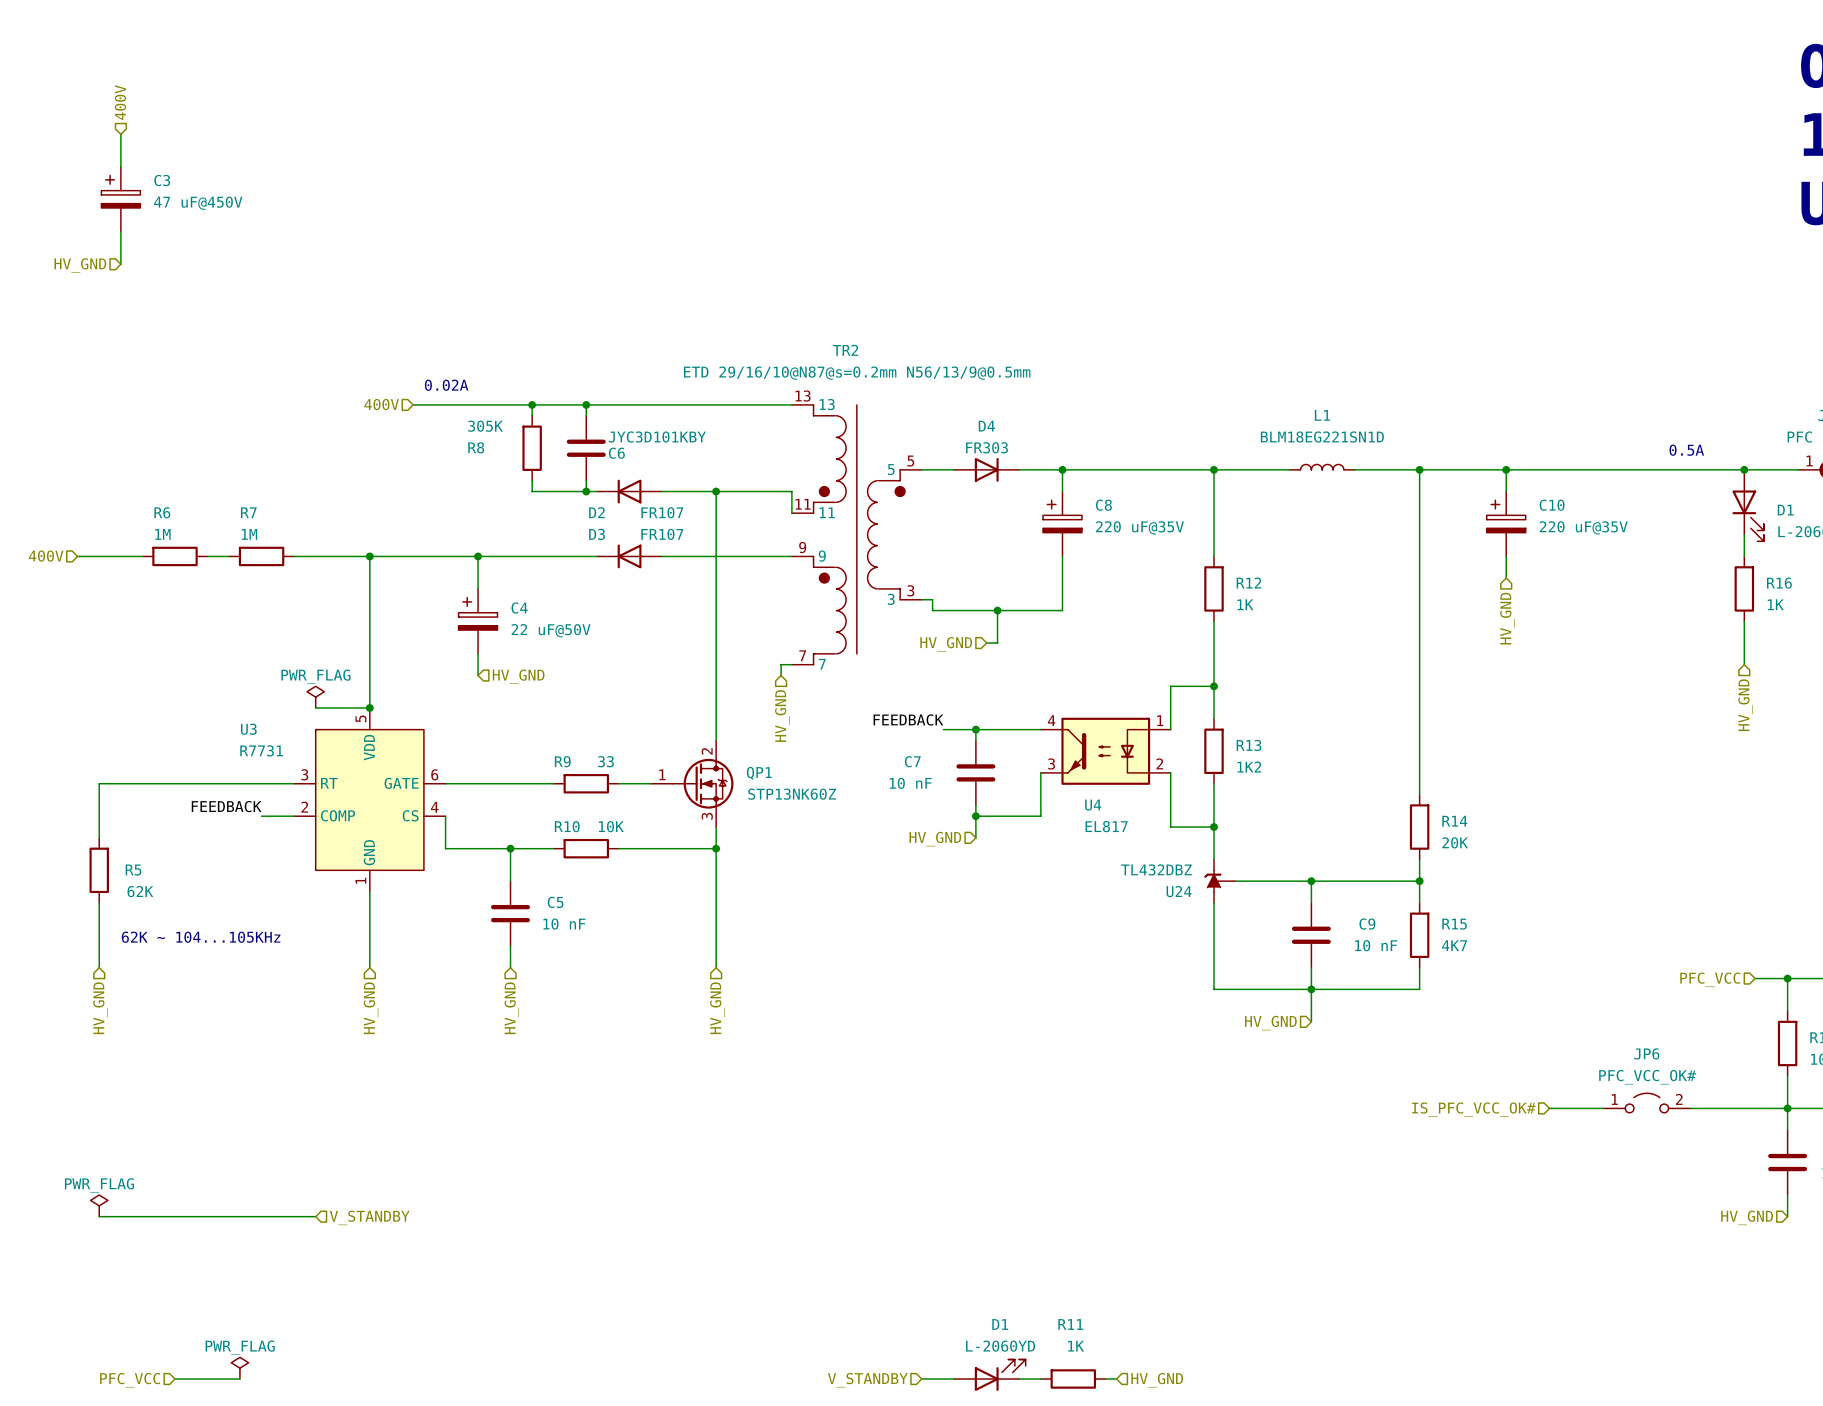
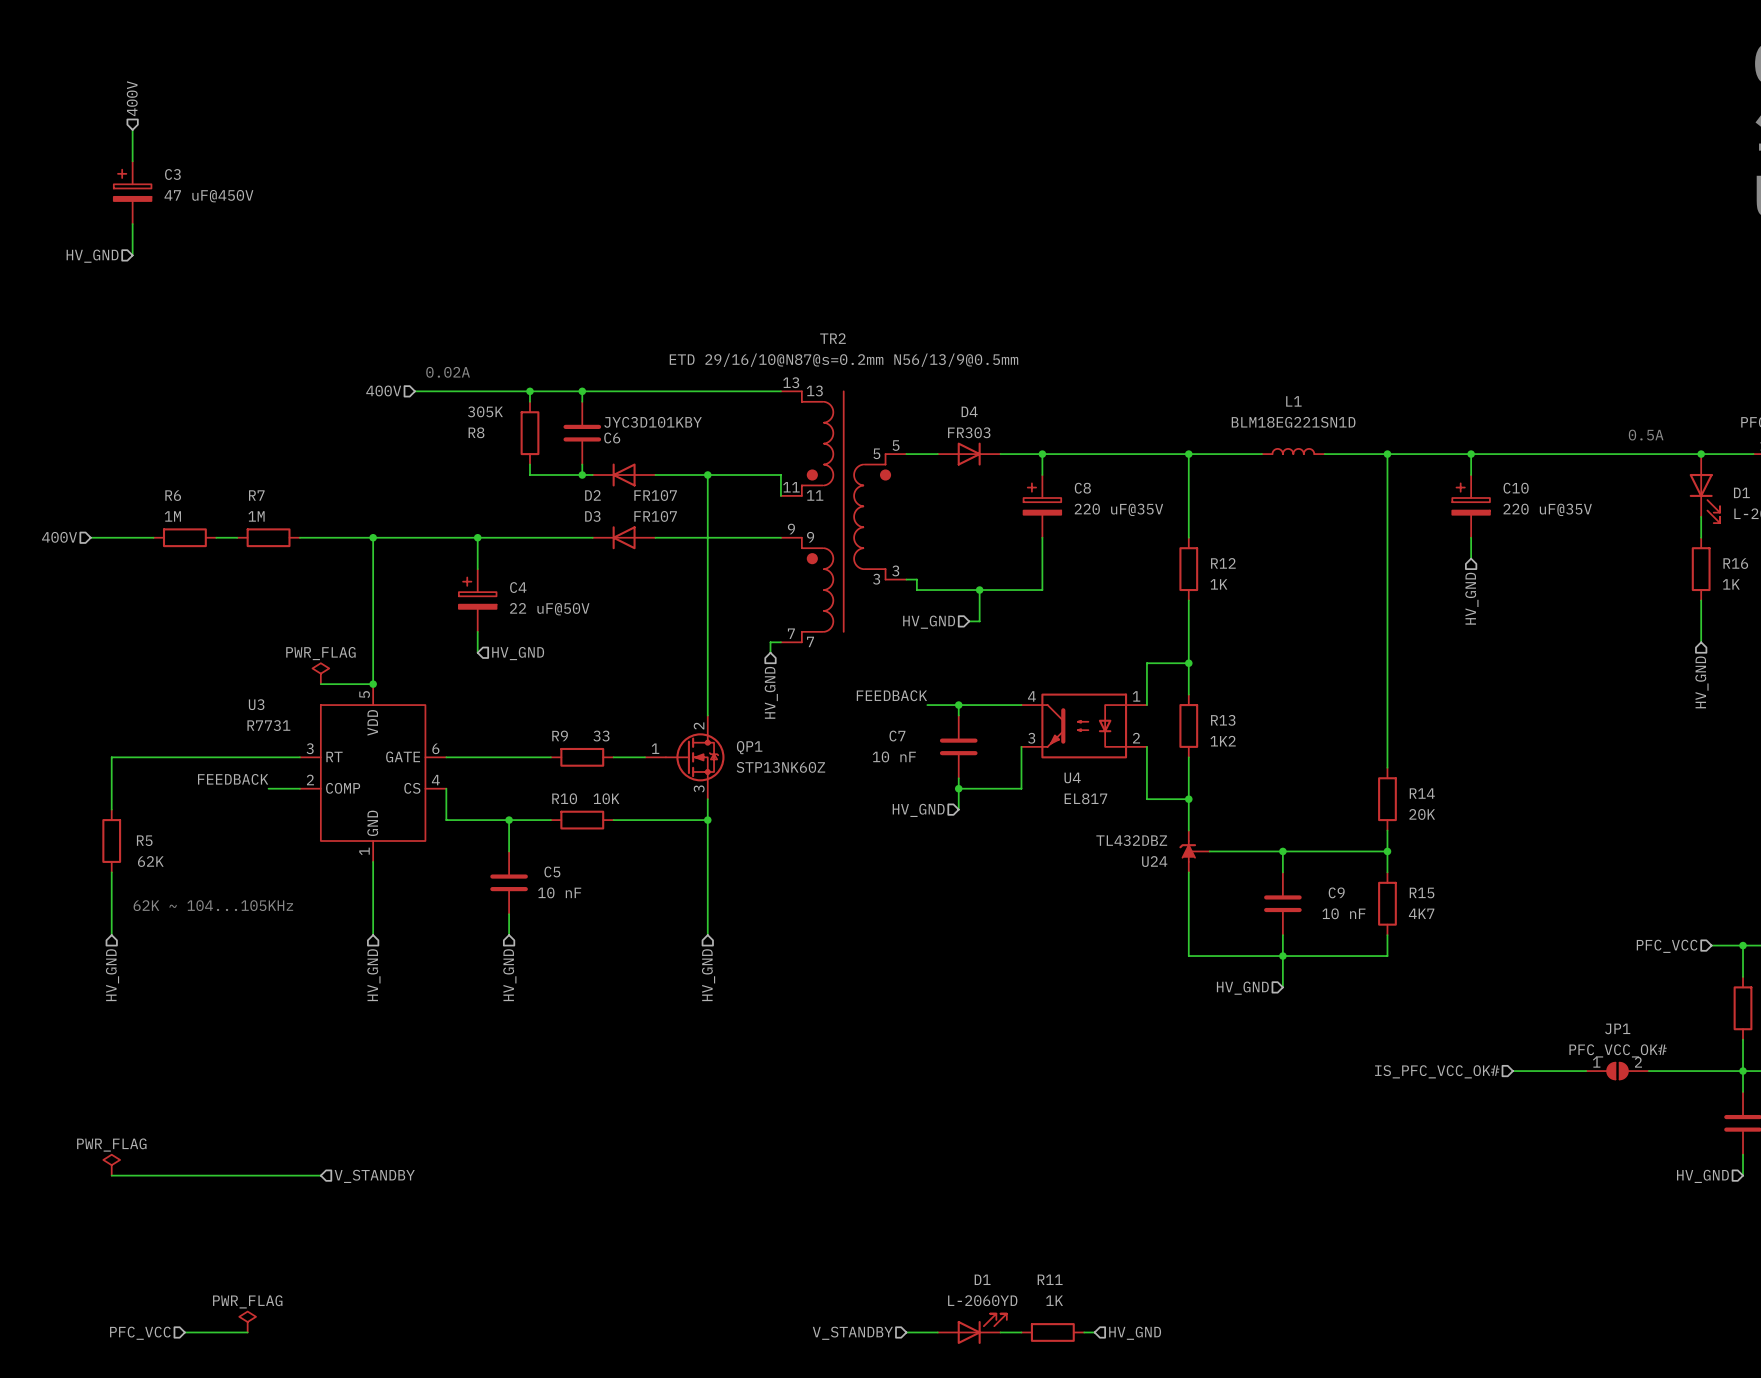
JP6: PFC_VCC_OK# (1646, 1103) -> none
JP1: none -> PFC_VCC_OK# (1617, 1071)

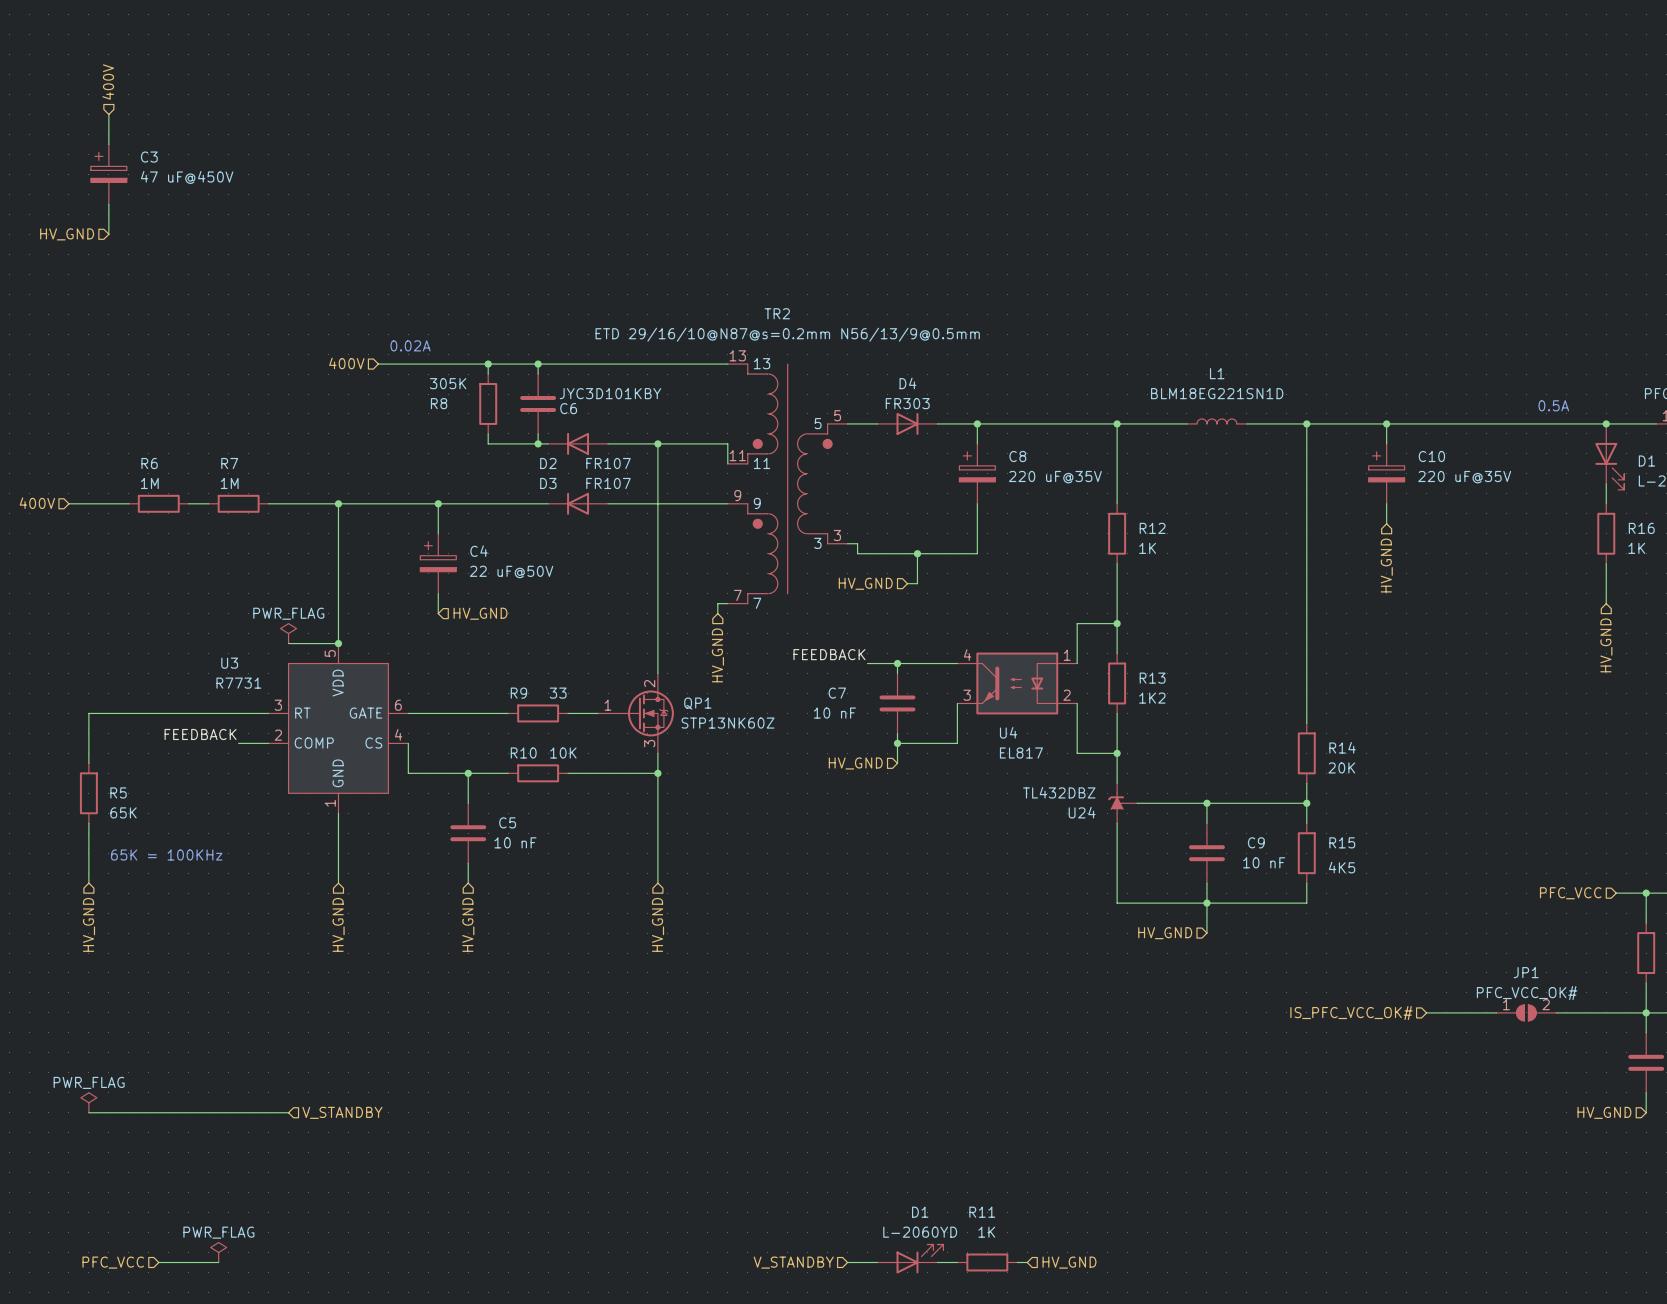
R5 value: 62K (150, 861) -> 65K (123, 812)
text: 62K ~ 104...105KHz (213, 905) -> 65K = 100KHz (166, 855)
R15 value: 4K7 (1421, 913) -> 4K5 (1342, 867)

